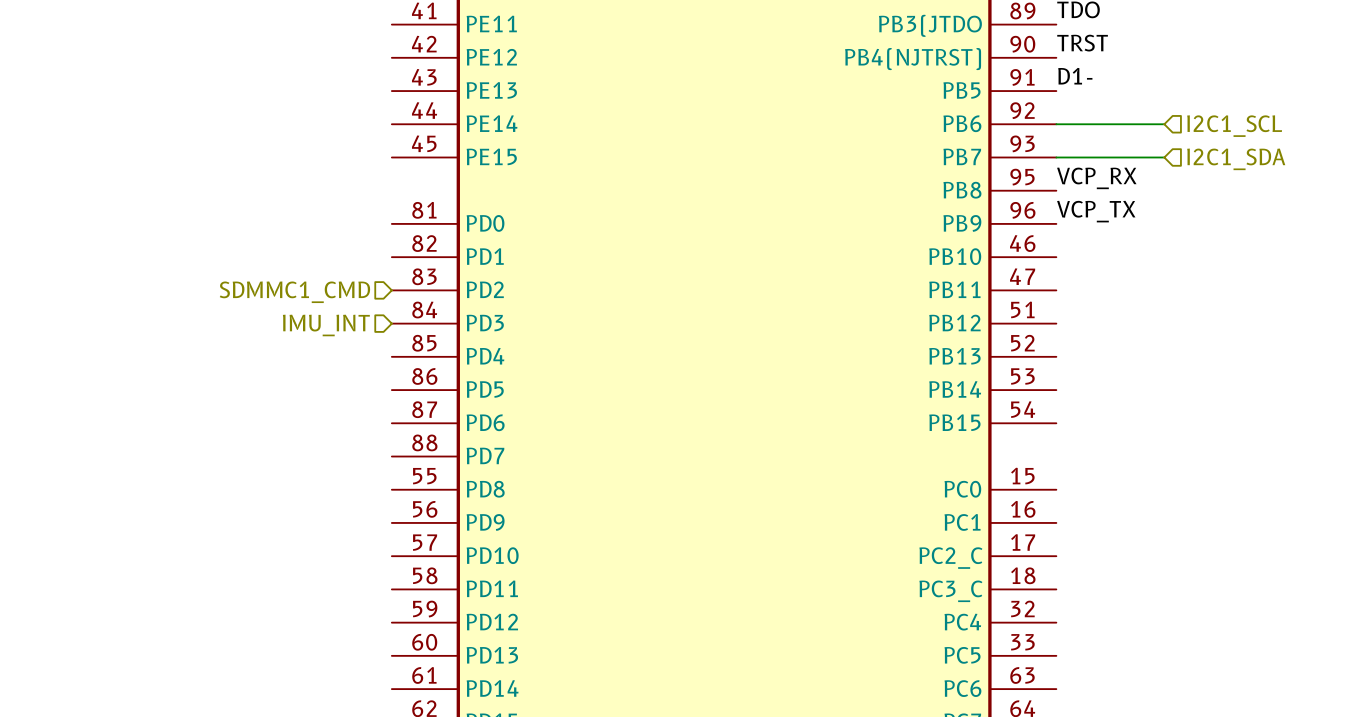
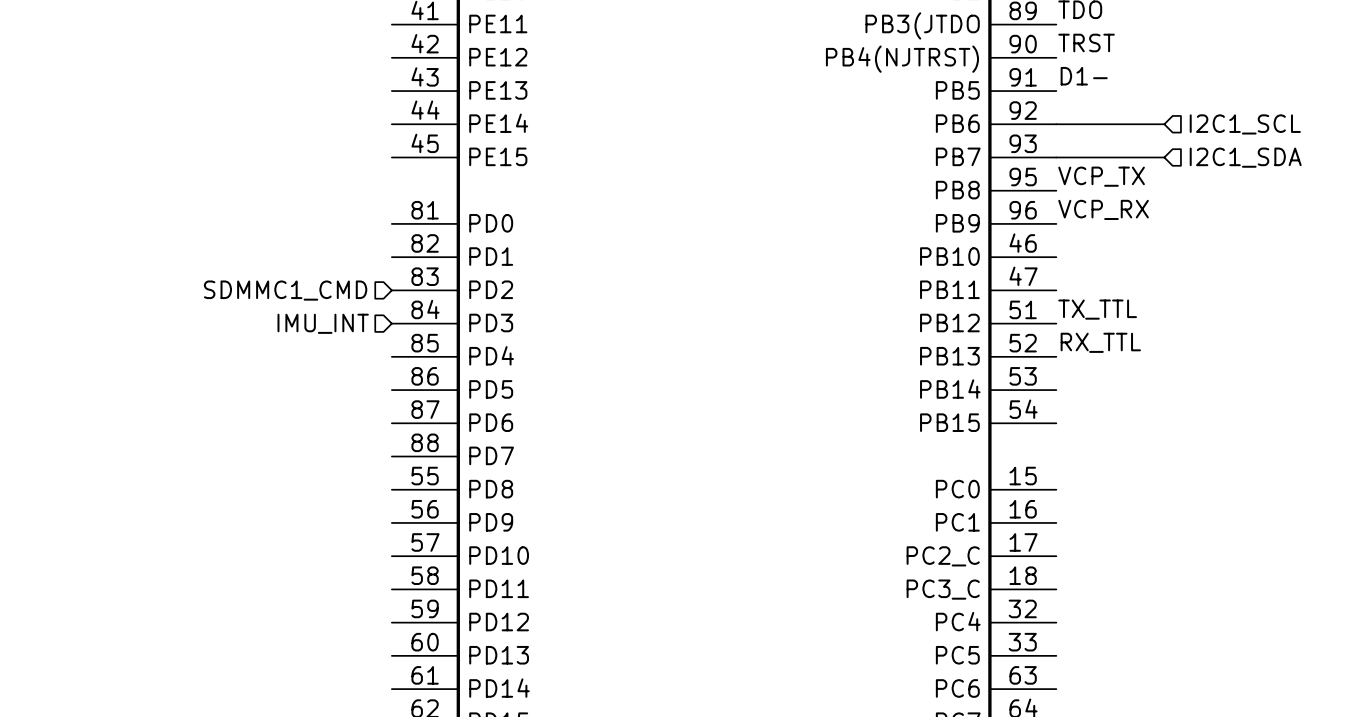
label: VCP_RX (1096, 178) -> VCP_TX (1101, 176)
label: VCP_TX (1096, 211) -> VCP_RX (1103, 209)
label: none -> TX_TTL (1097, 309)
label: none -> RX_TTL (1100, 342)

